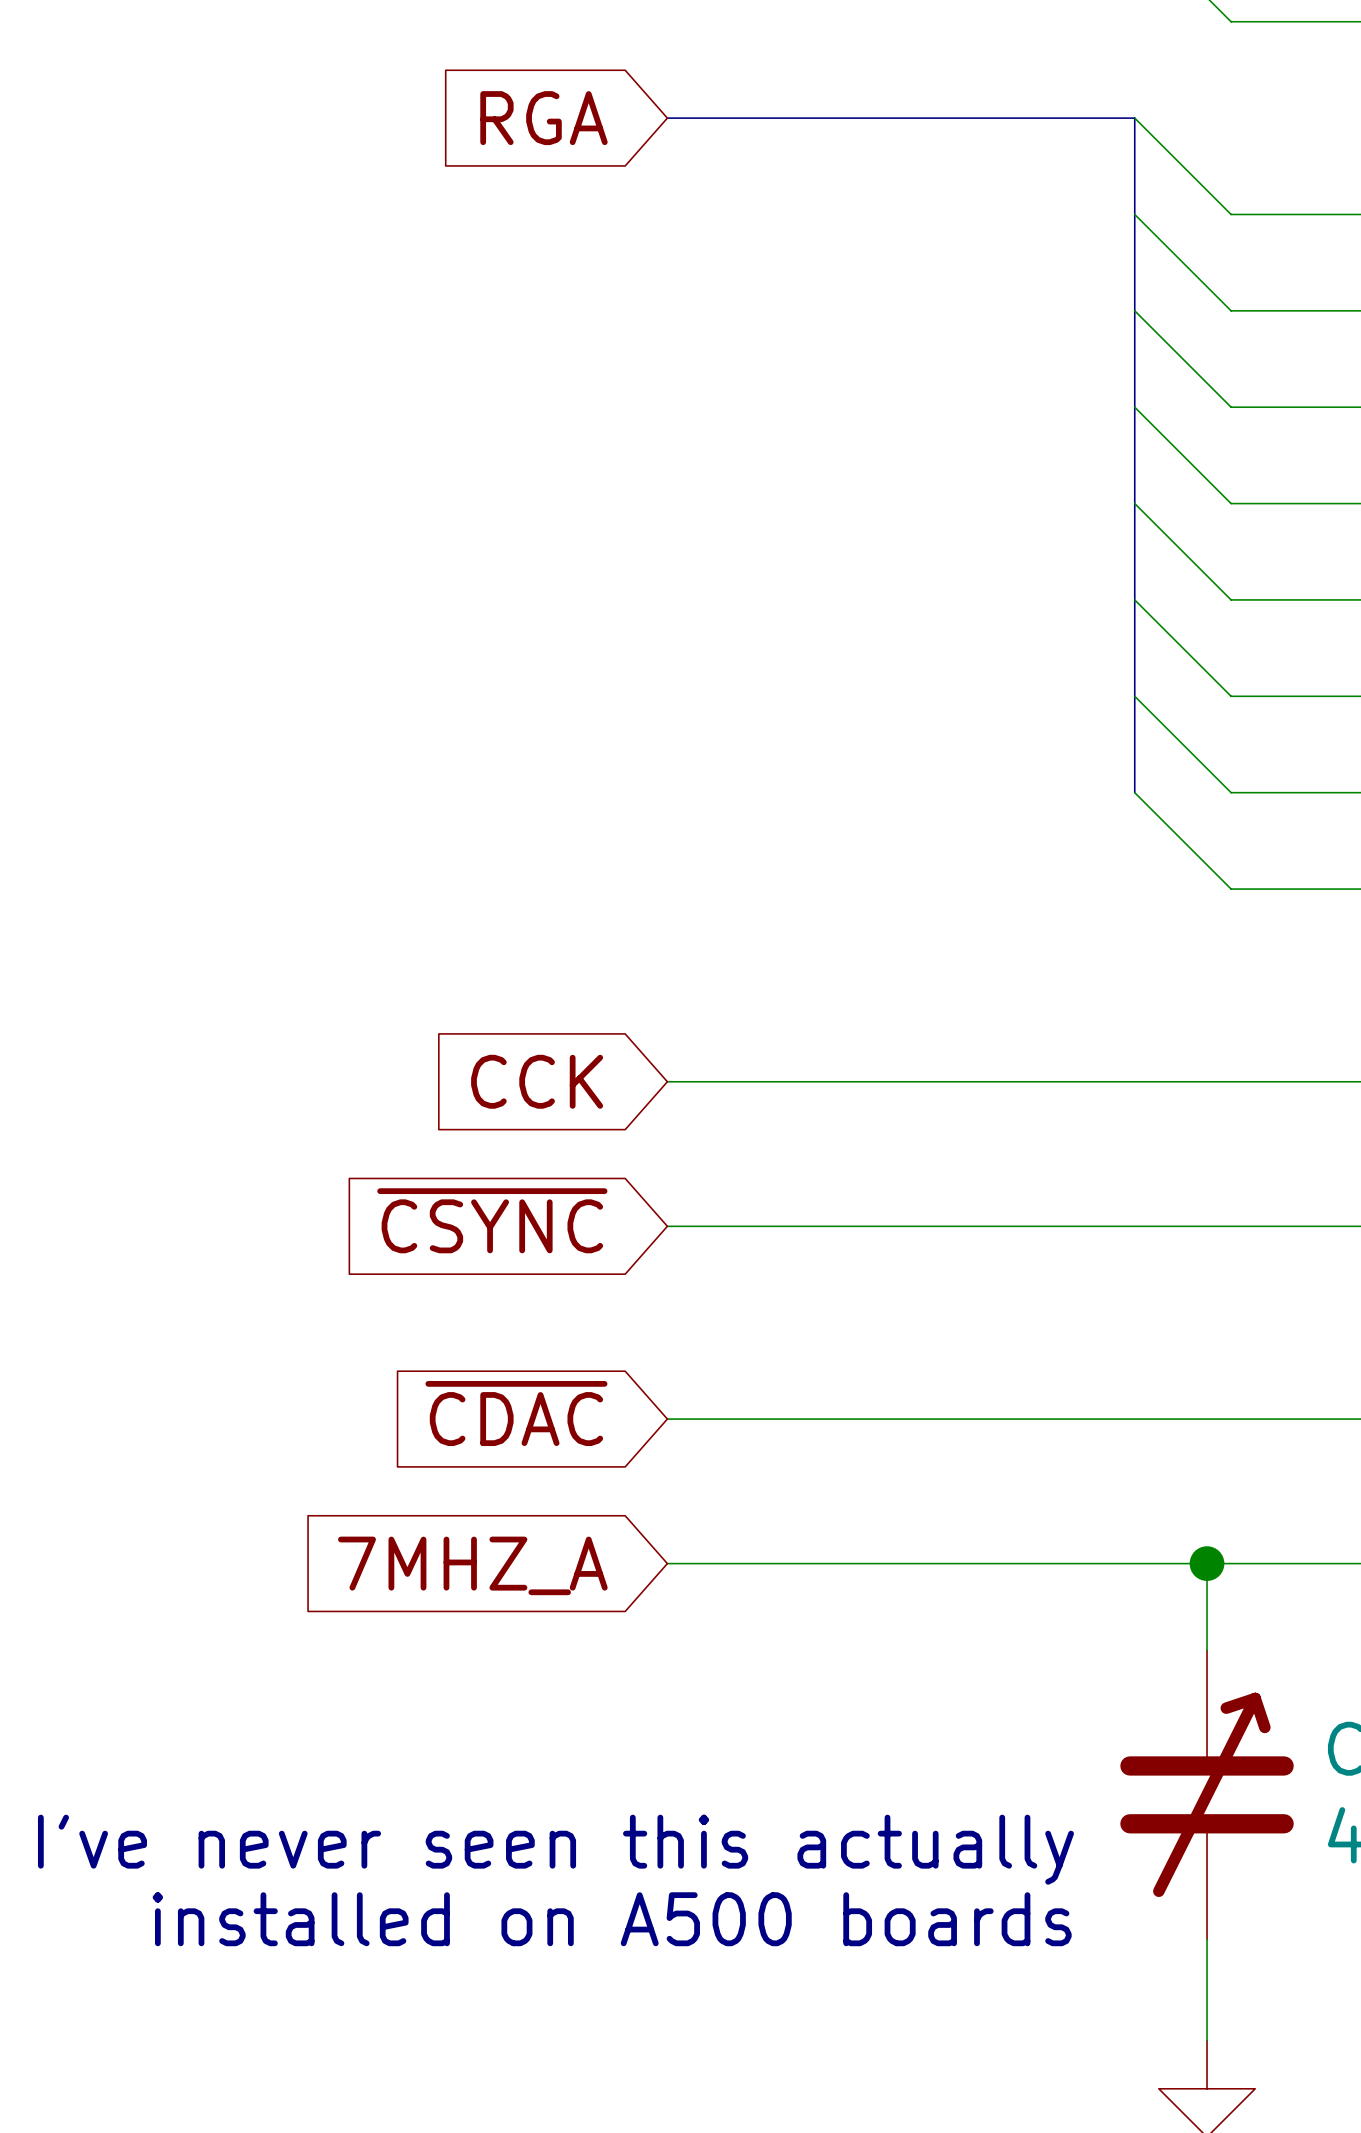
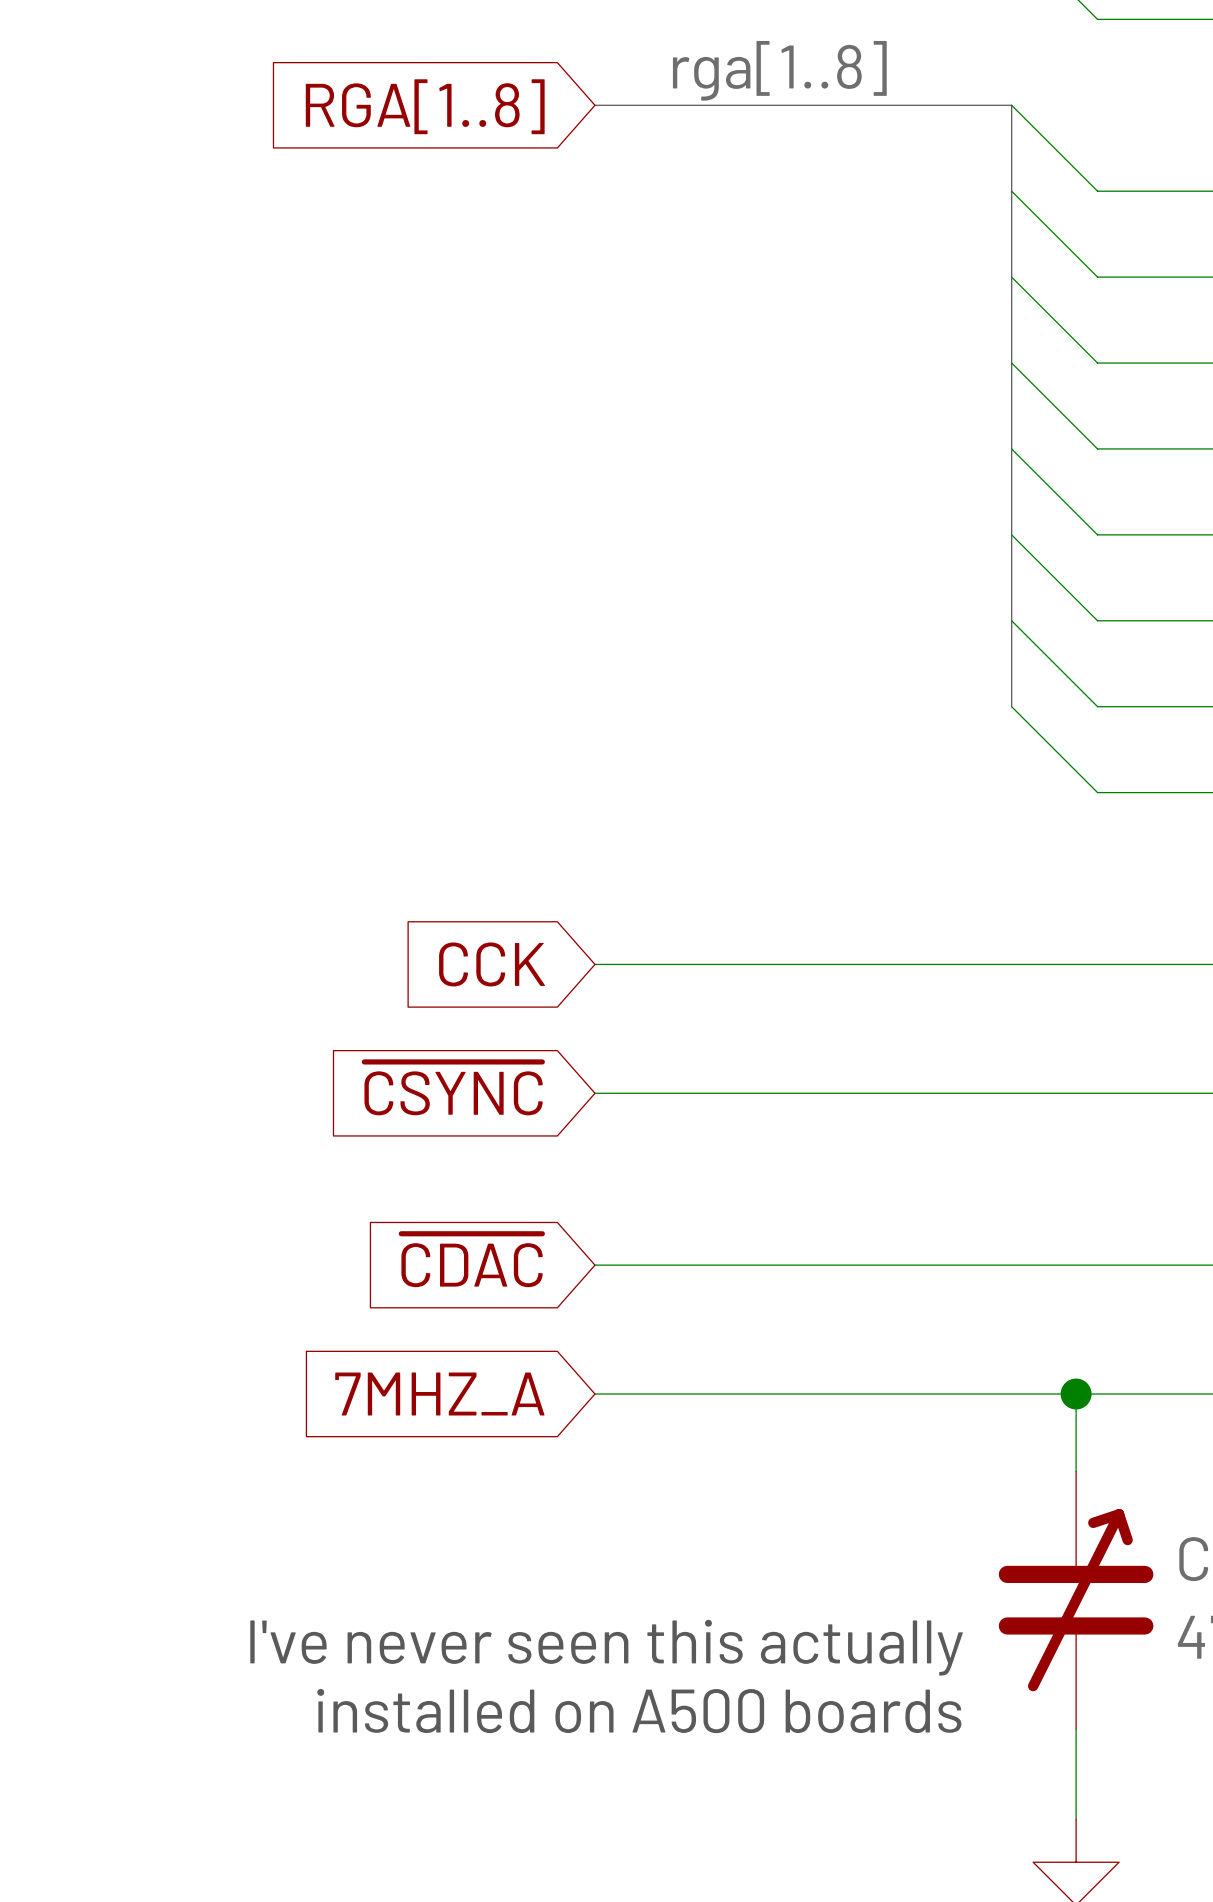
label: none -> rga[1..8] (779, 70)
global label: RGA (543, 118) -> RGA[1..8] (425, 106)

